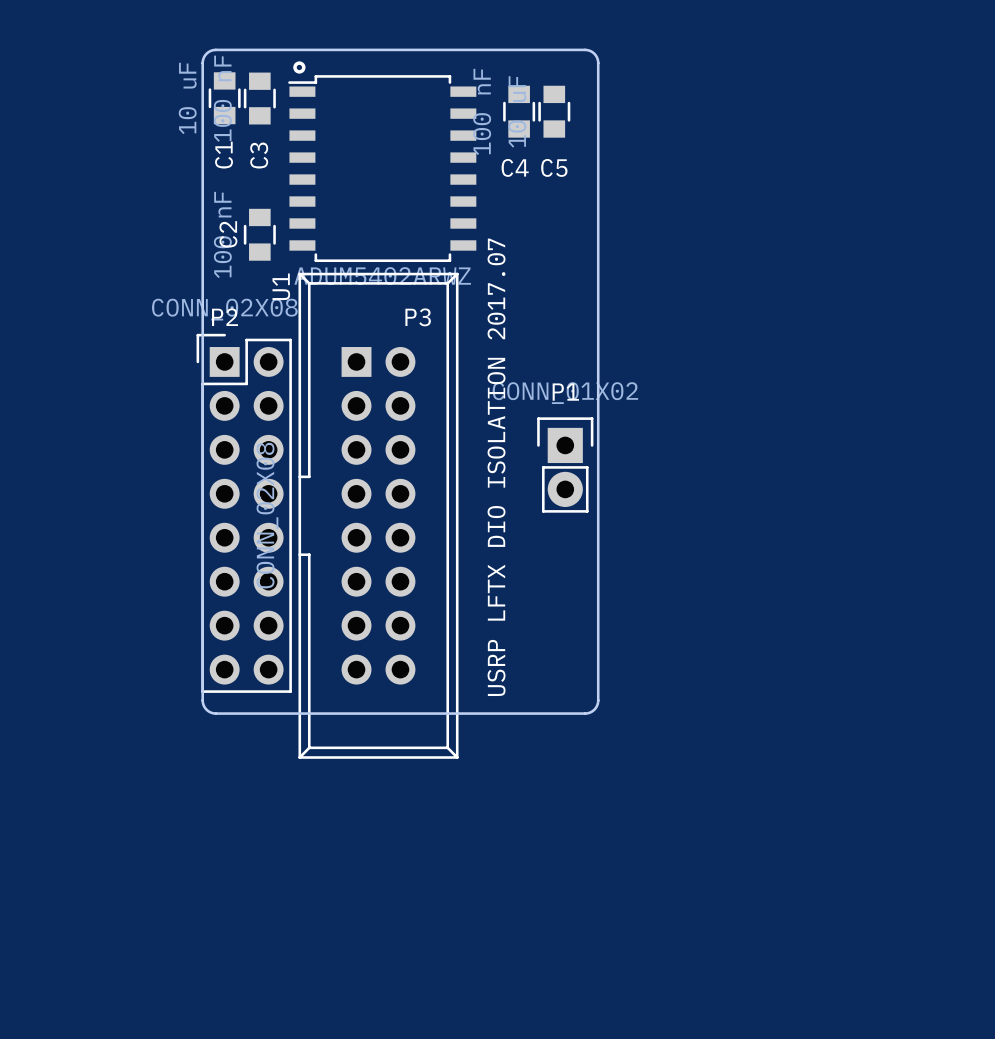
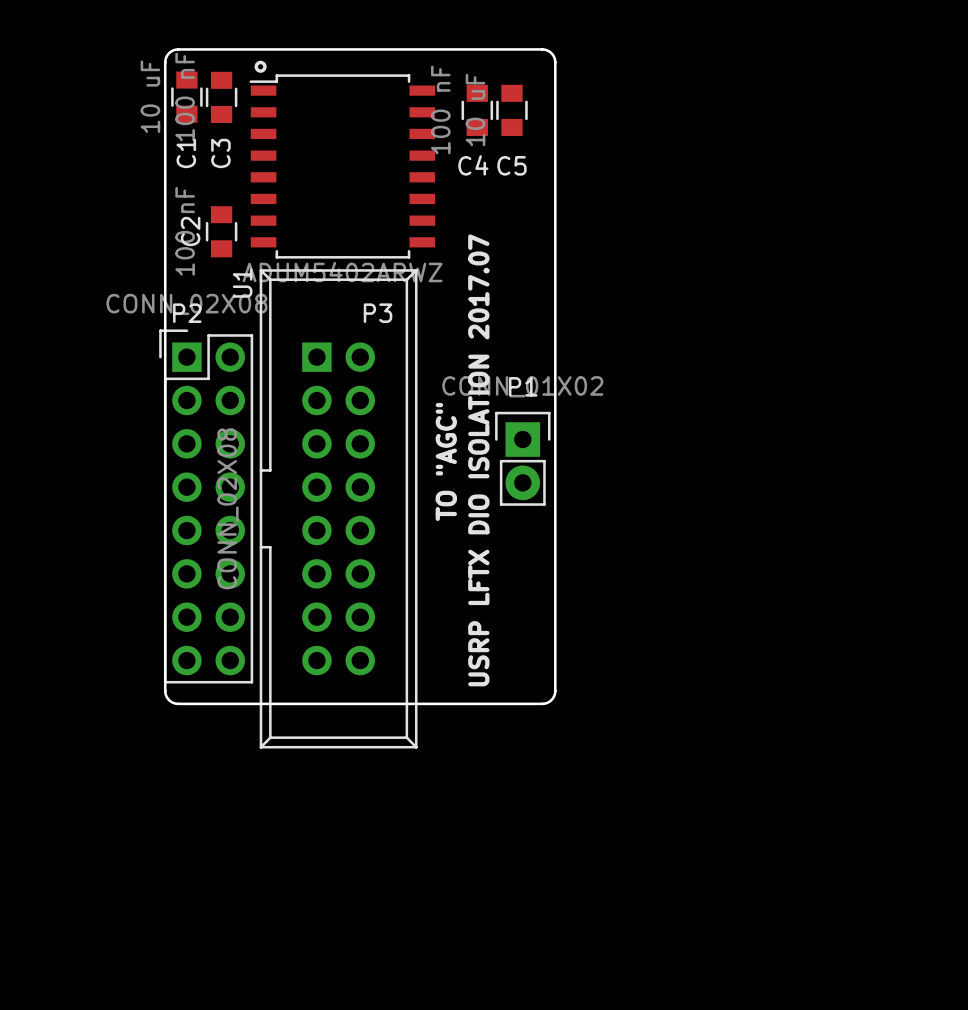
text: USRP LFTX DIO ISOLATION 2017.07 (496, 467) -> TO "AGC" (446, 461)
text: none -> USRP LFTX DIO ISOLATION 2017.07 (478, 460)

